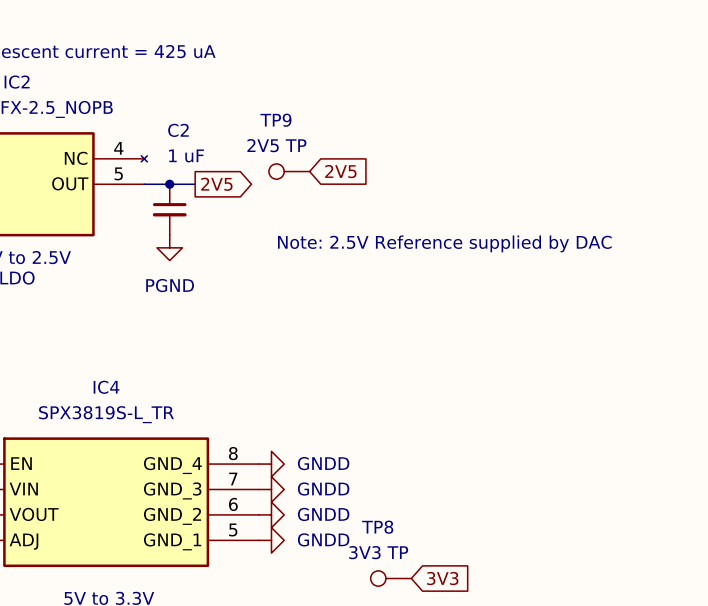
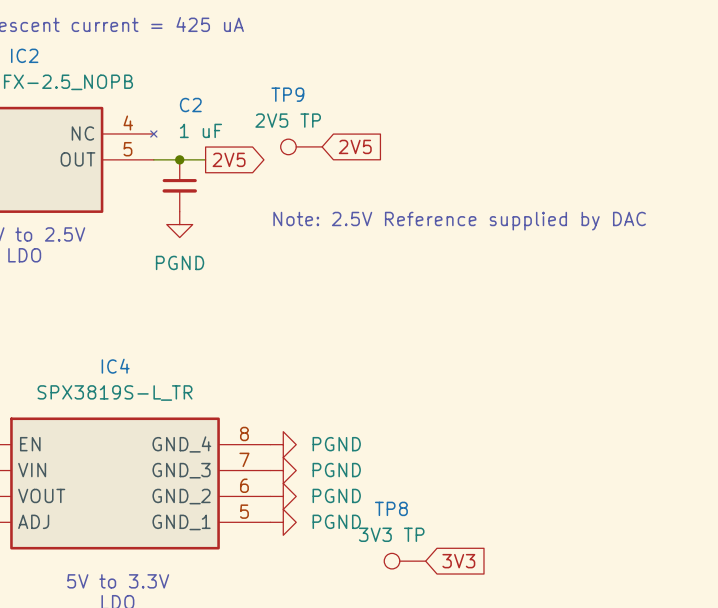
power symbol: GNDD (271, 464) -> PGND (283, 444)
power symbol: GNDD (271, 489) -> PGND (283, 470)
power symbol: GNDD (271, 514) -> PGND (283, 496)
power symbol: GNDD (271, 540) -> PGND (283, 522)

